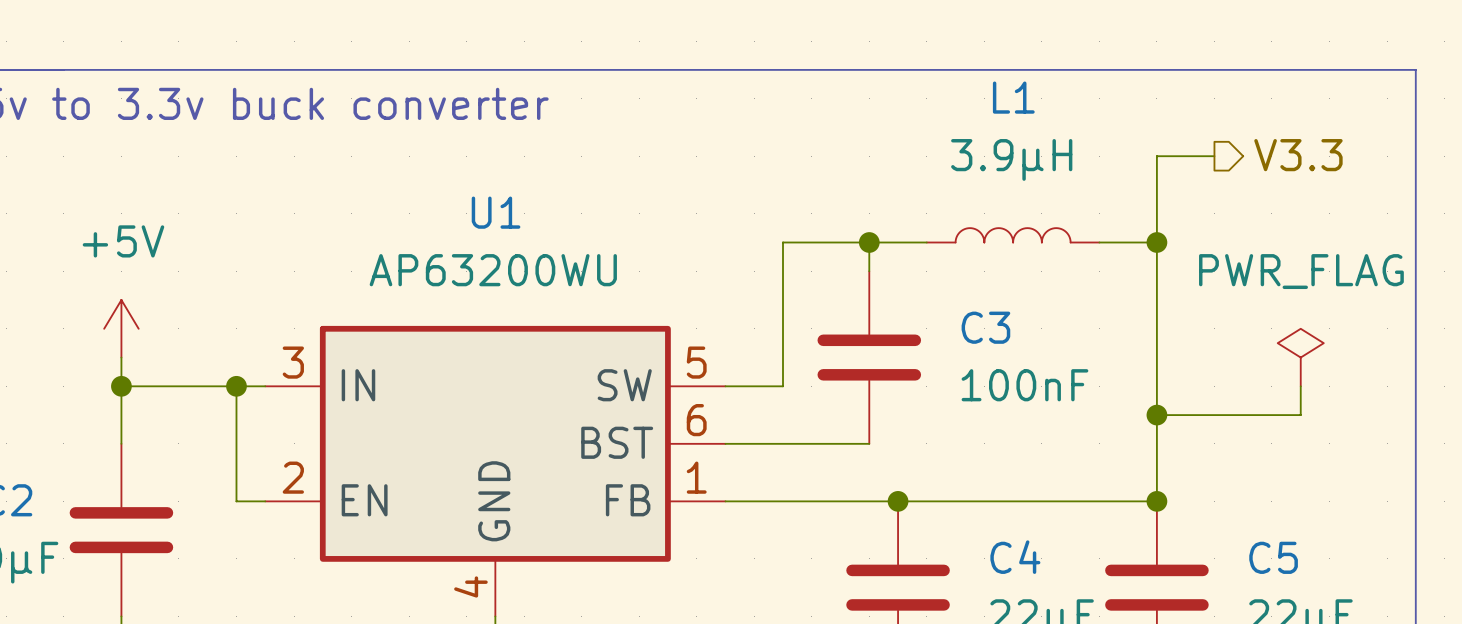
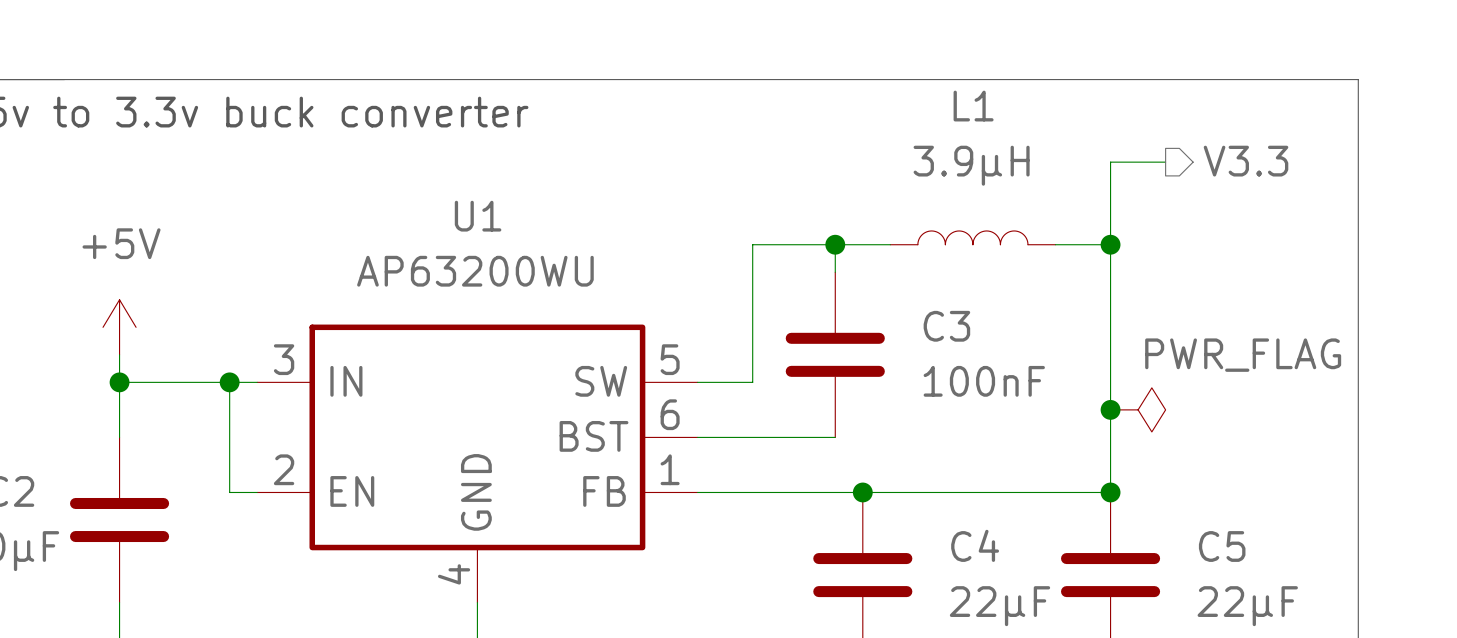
power symbol text position: PWR_FLAG (1301, 271) -> PWR_FLAG (1243, 355)
power symbol rotation: 0° (1300, 357) -> 90° clockwise (1138, 409)
power symbol position: PWR_FLAG (1300, 357) -> PWR_FLAG (1138, 409)
wire: (1300, 386) (1300, 415) (1156, 415) -> none

